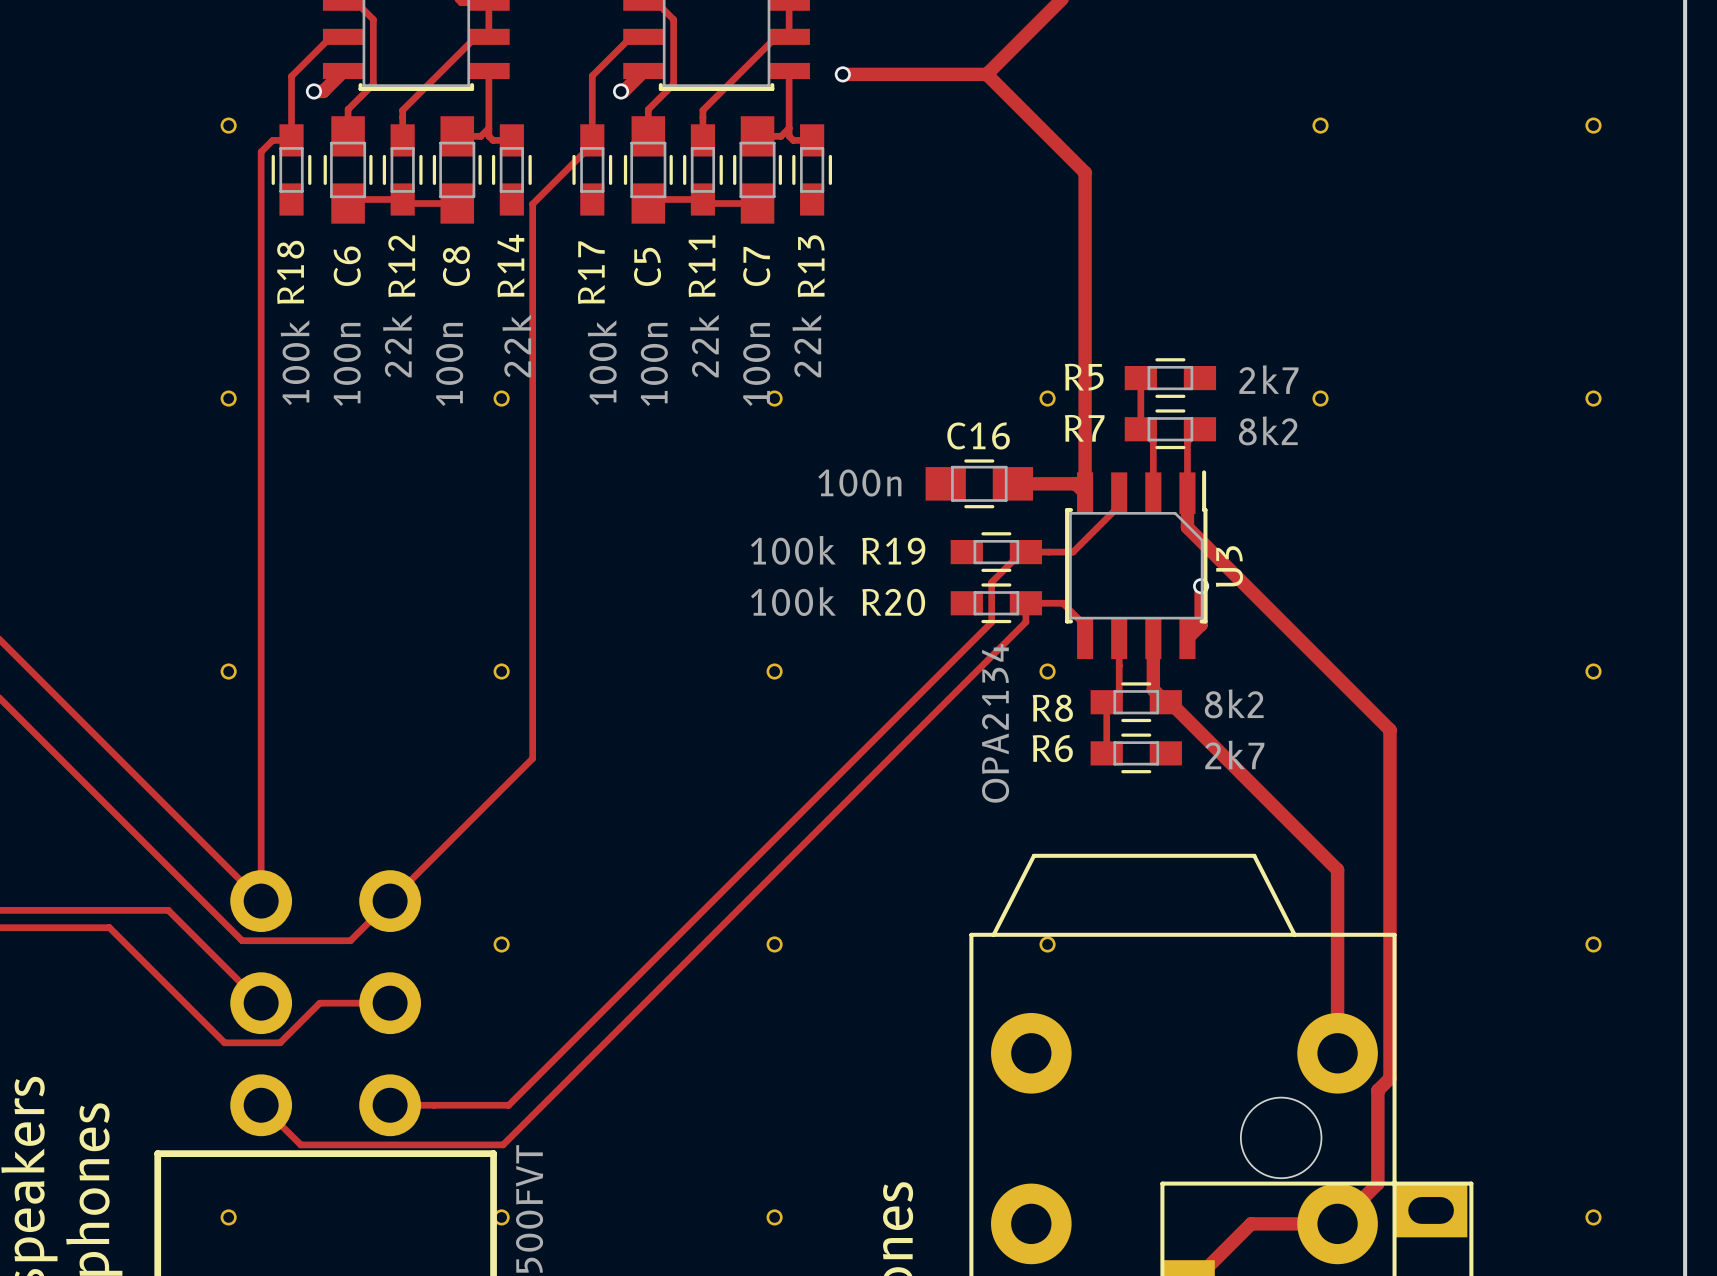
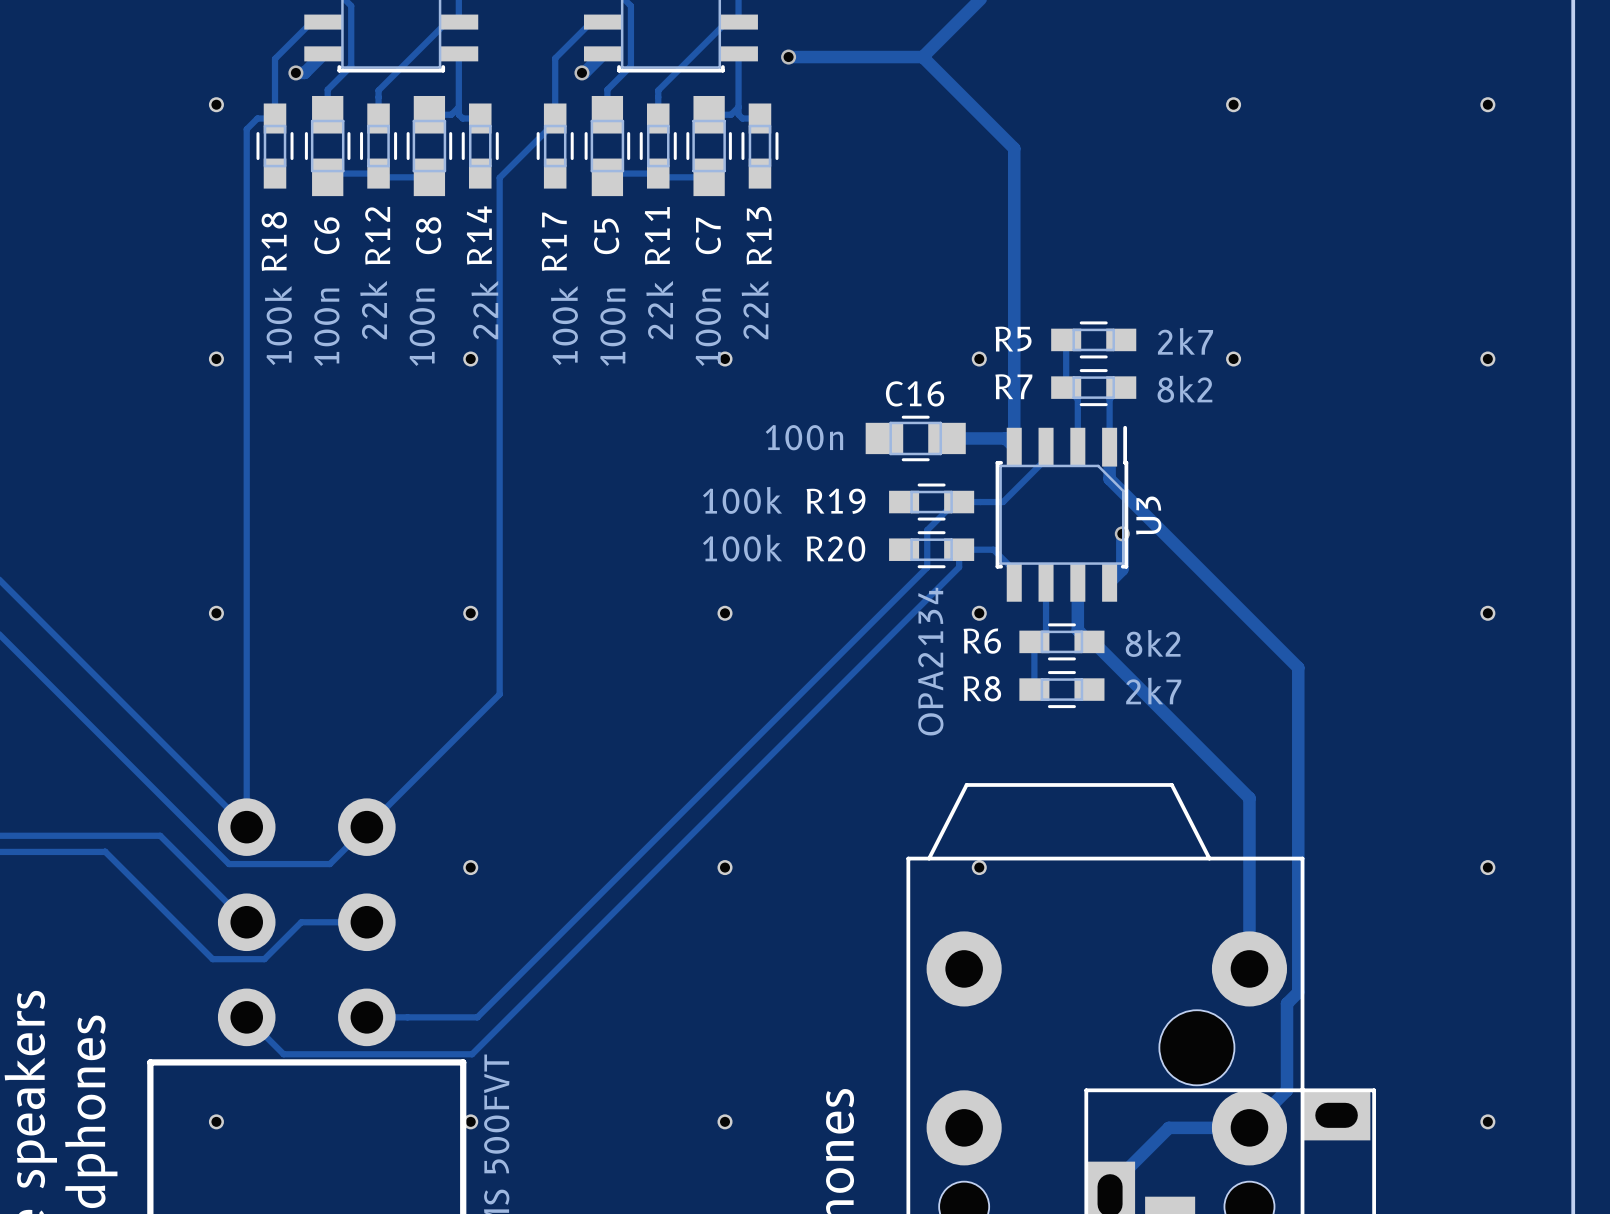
R8 name position: R8 (1052, 708) -> R8 (982, 688)
R6 name position: R6 (1052, 748) -> R6 (982, 641)

